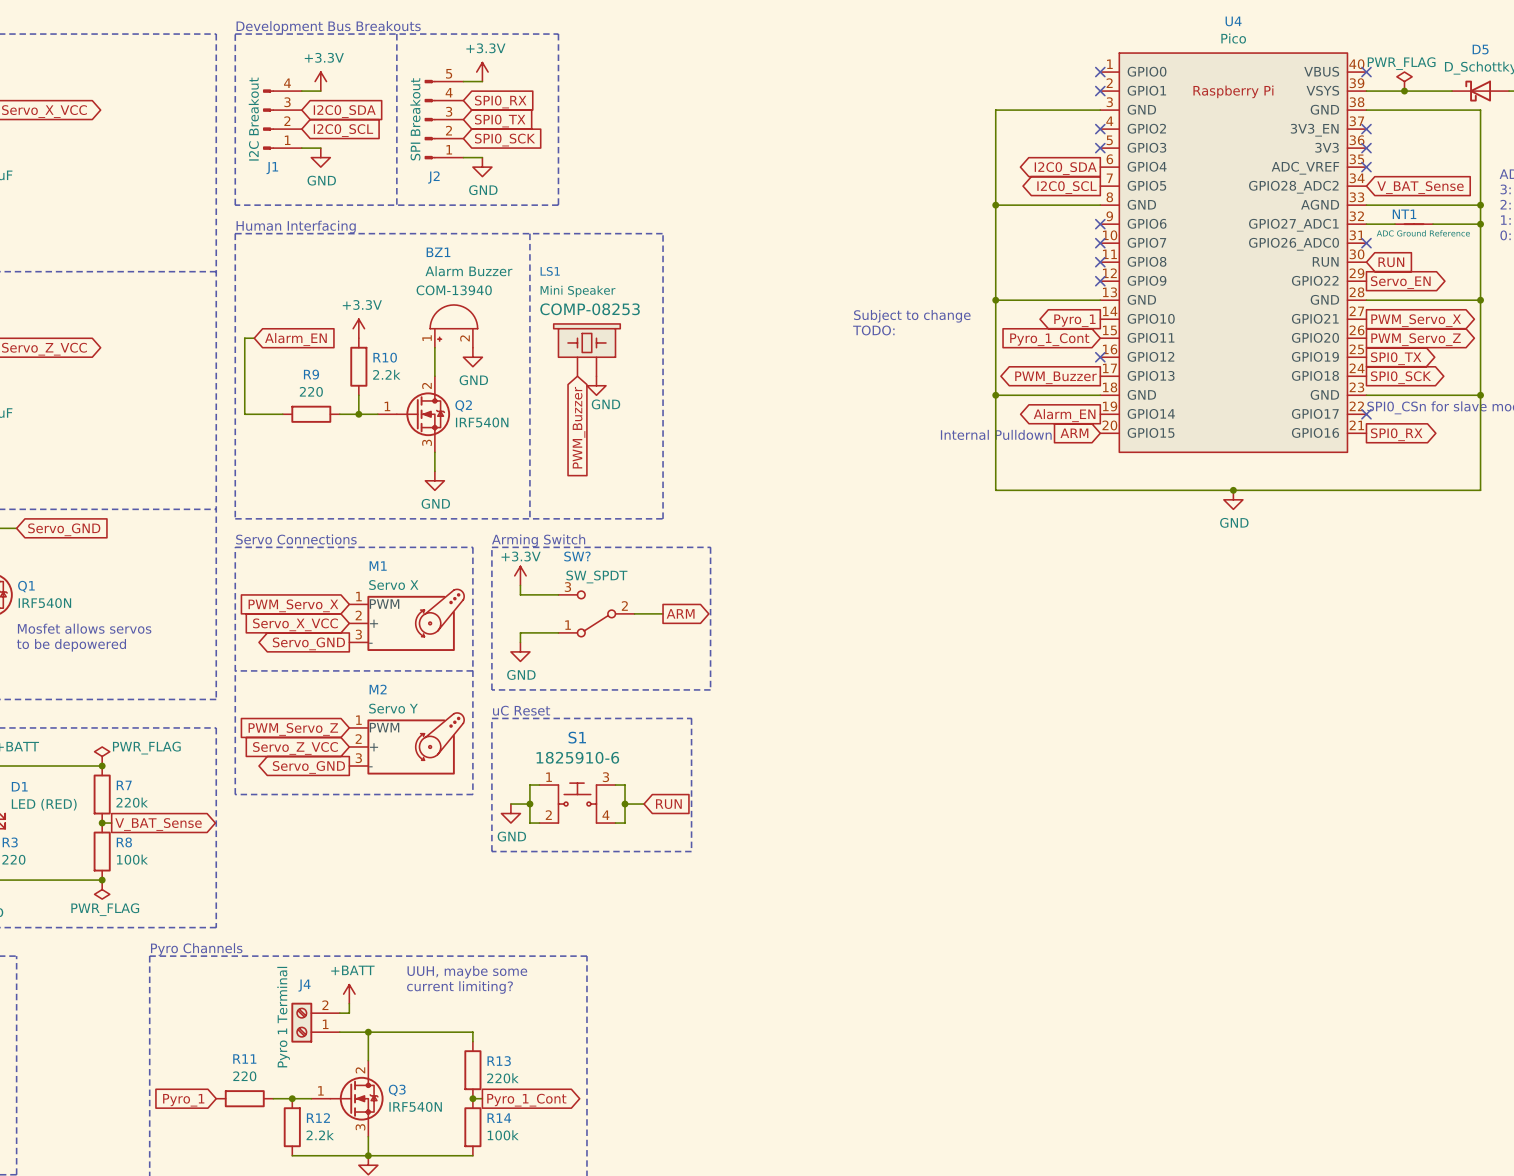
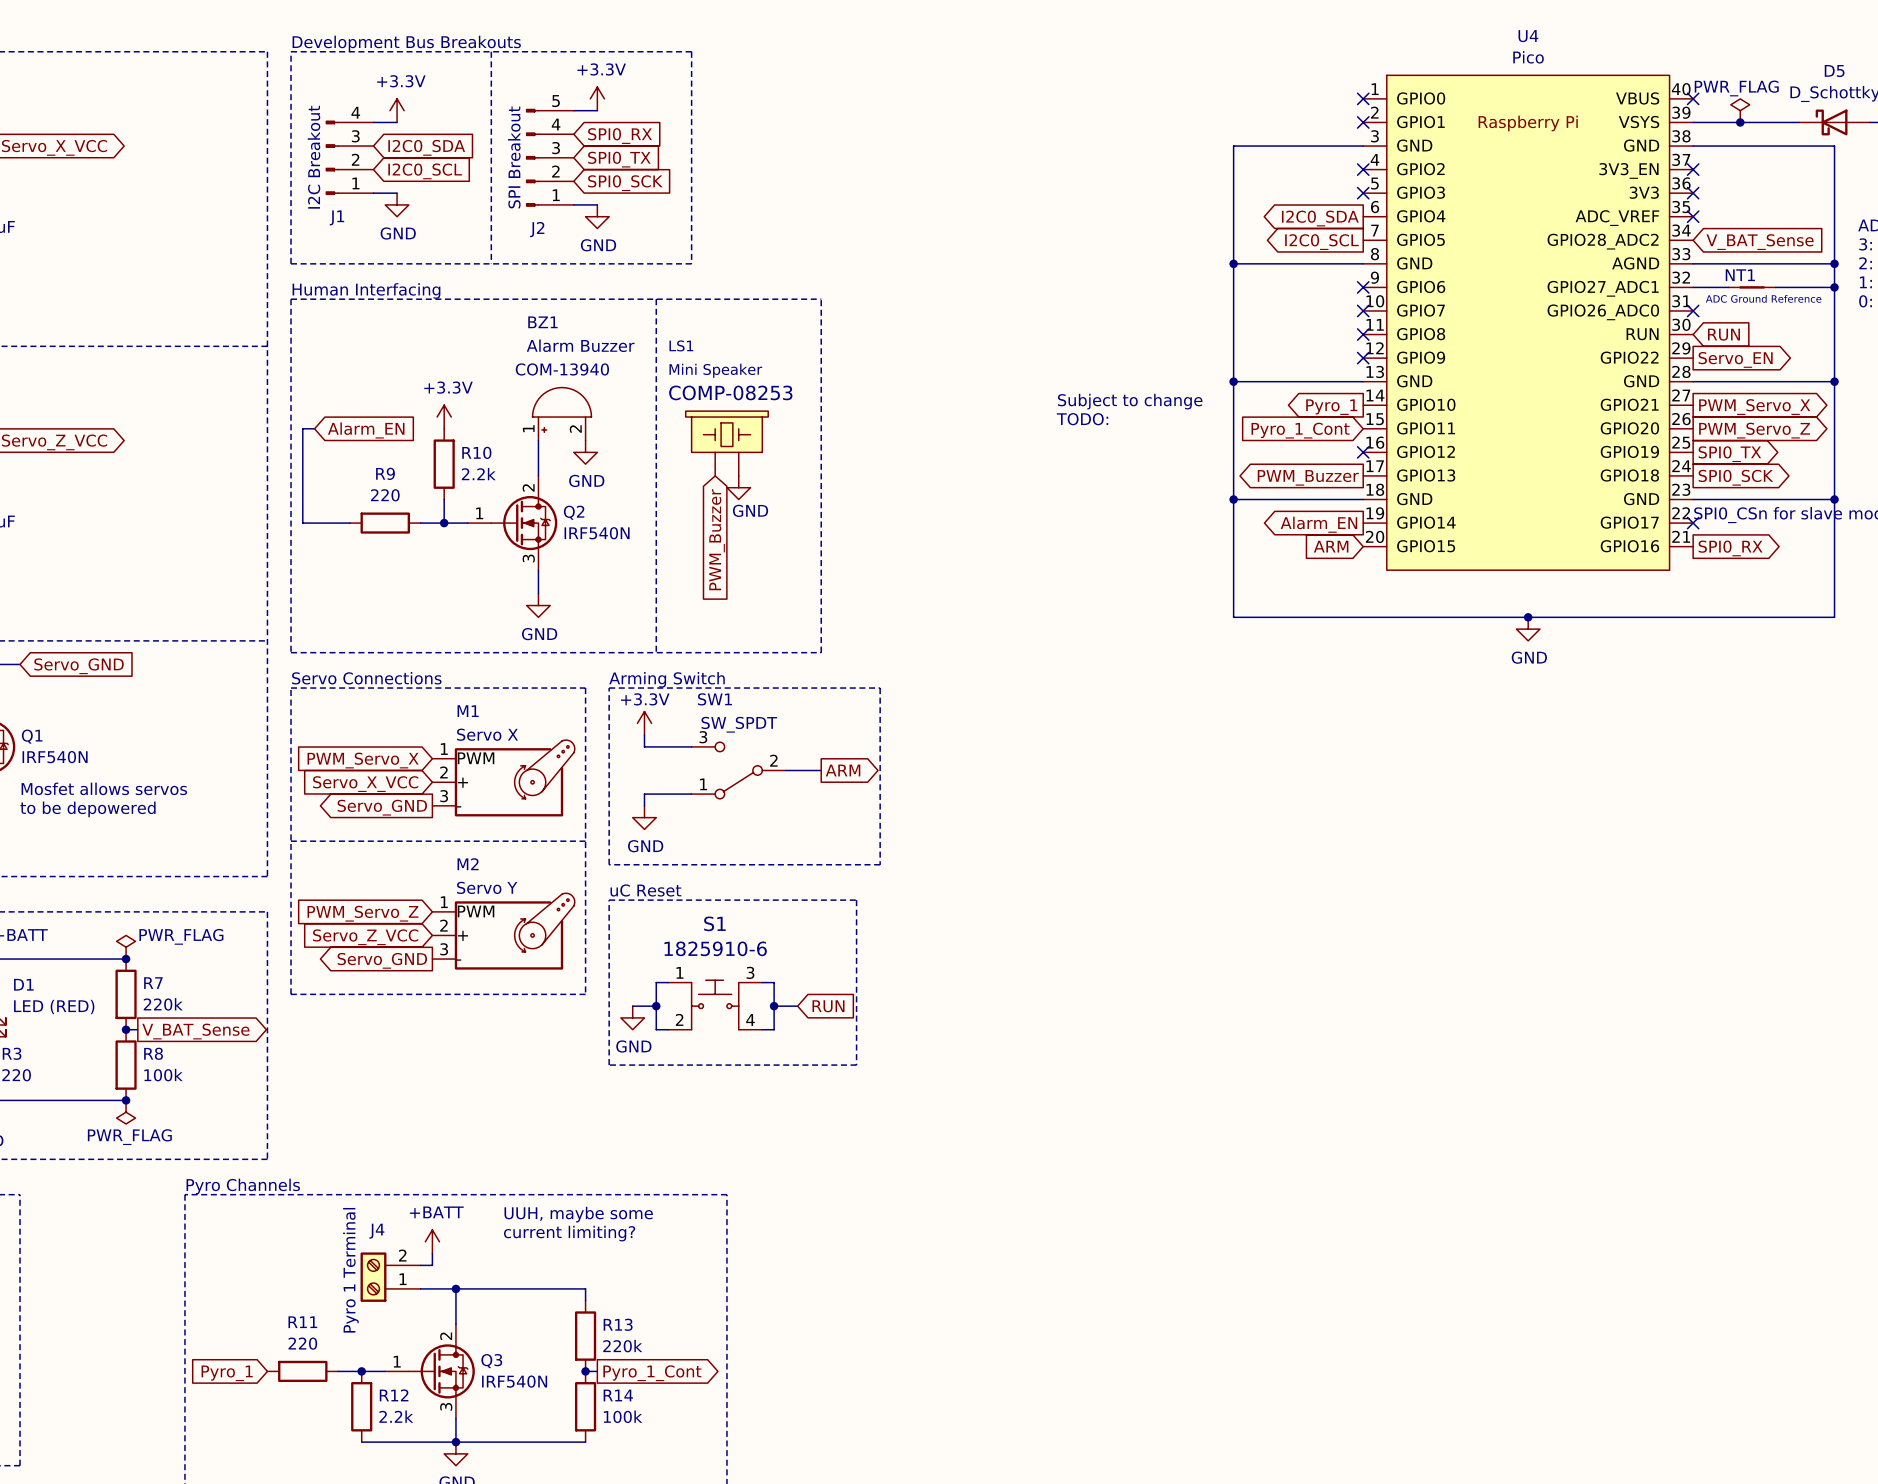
text: Internal Pulldown (996, 434) -> none
SW? name: SW? (577, 556) -> SW1 (714, 699)

